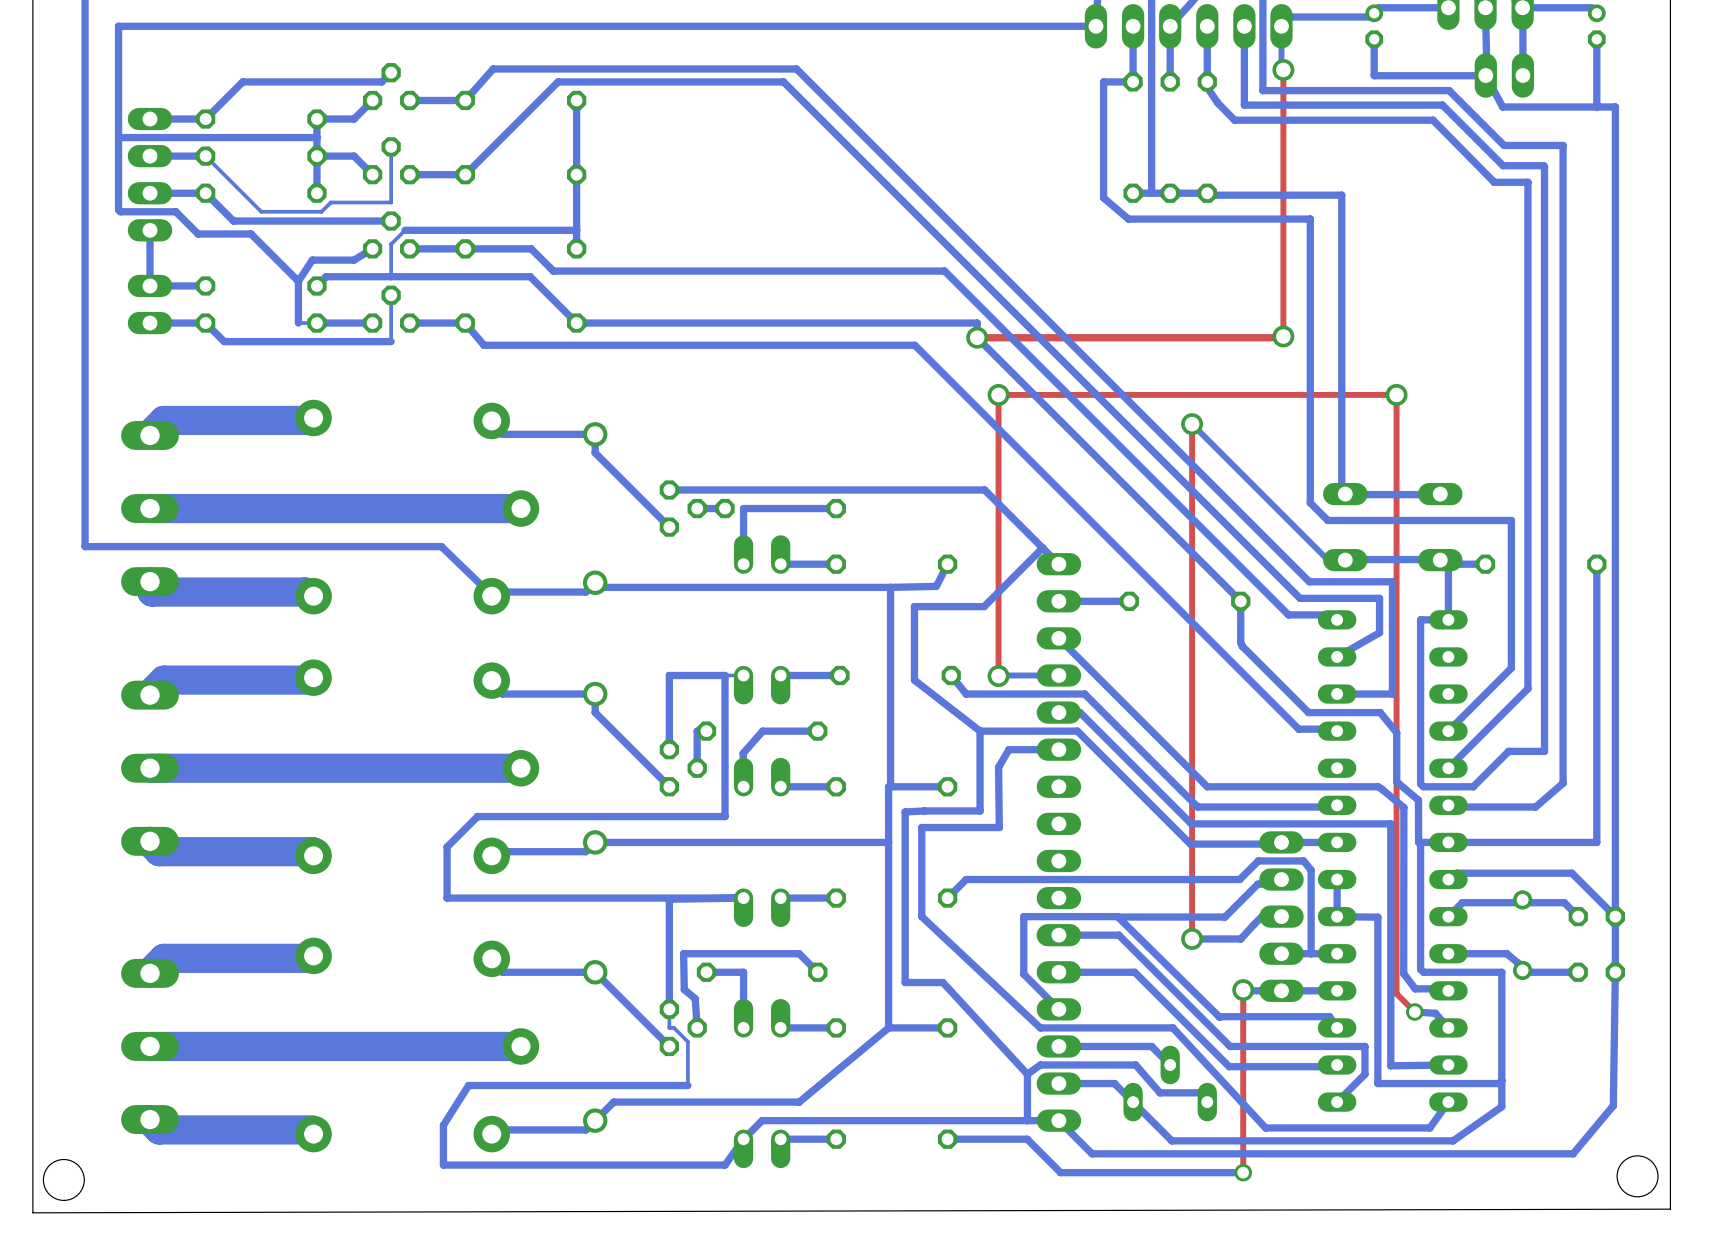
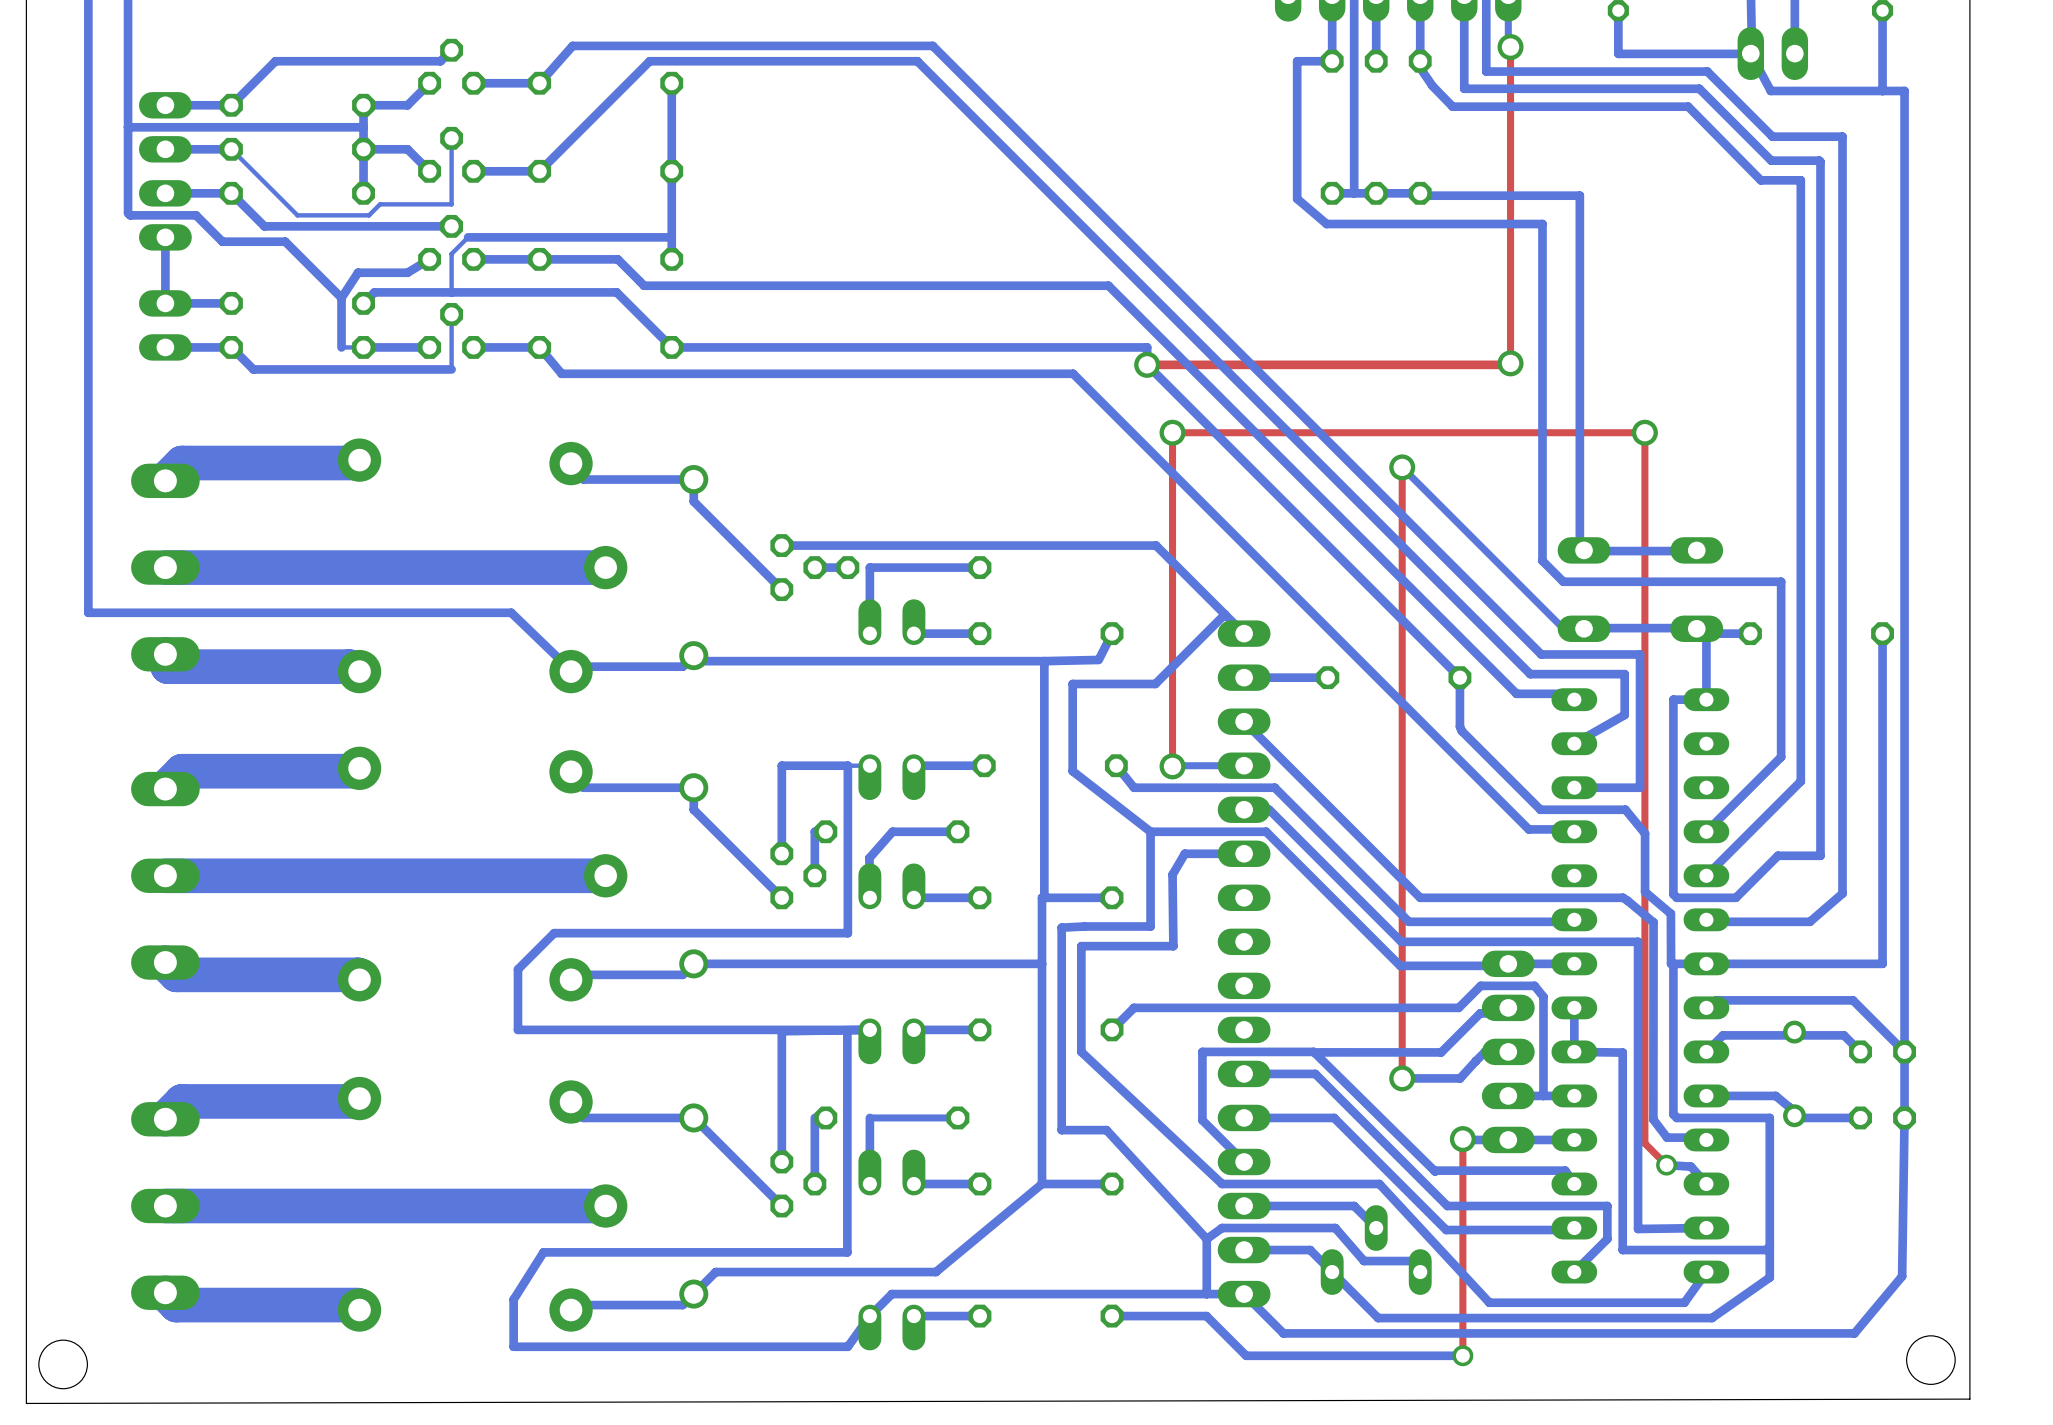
bottom track: (743, 972) (706, 972) -> (814, 1183) (814, 1117) (825, 1117)
bottom track: (817, 972) (799, 953) (683, 953) (684, 989) (695, 998) (697, 1027) -> (957, 1117) (869, 1117)
bottom track: (669, 1009) (669, 1027) (674, 1027) (687, 1041) (687, 1085) -> (847, 1030) (847, 1252) (803, 1252)

